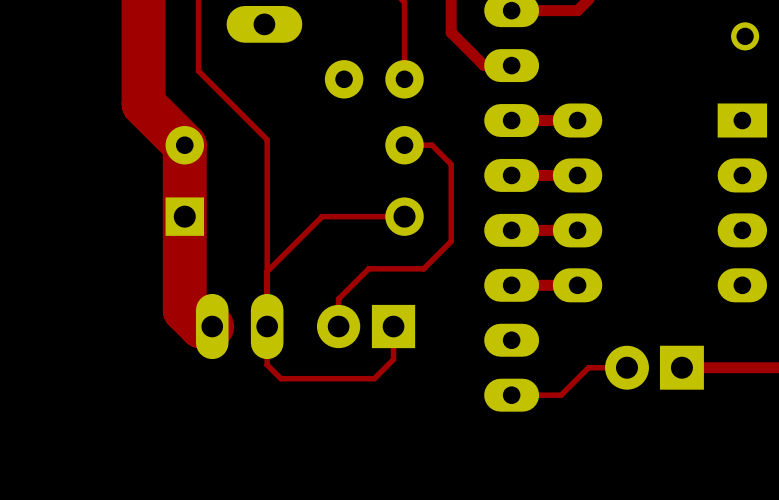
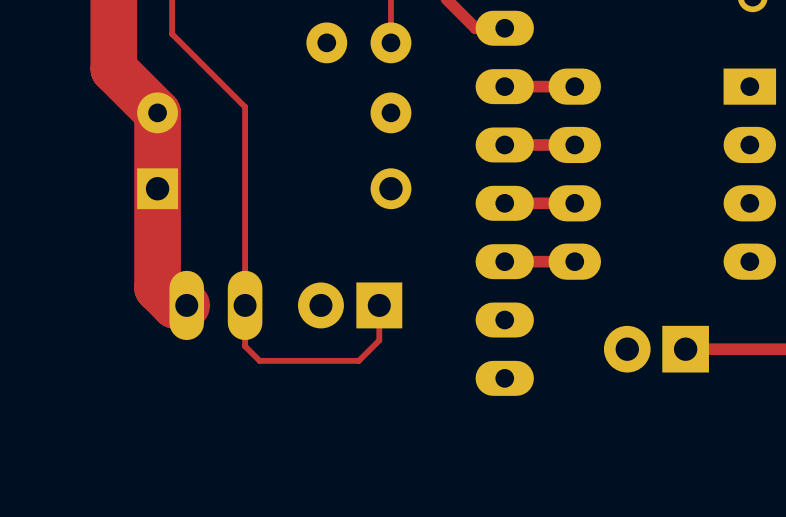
top track: (404, 145) (431, 145) (451, 164) (451, 241) (423, 268) (368, 268) (338, 299) (338, 326) -> none
top track: (404, 216) (322, 216) (267, 271) -> none
top track: (627, 367) (588, 367) (561, 395) (511, 395) -> none

